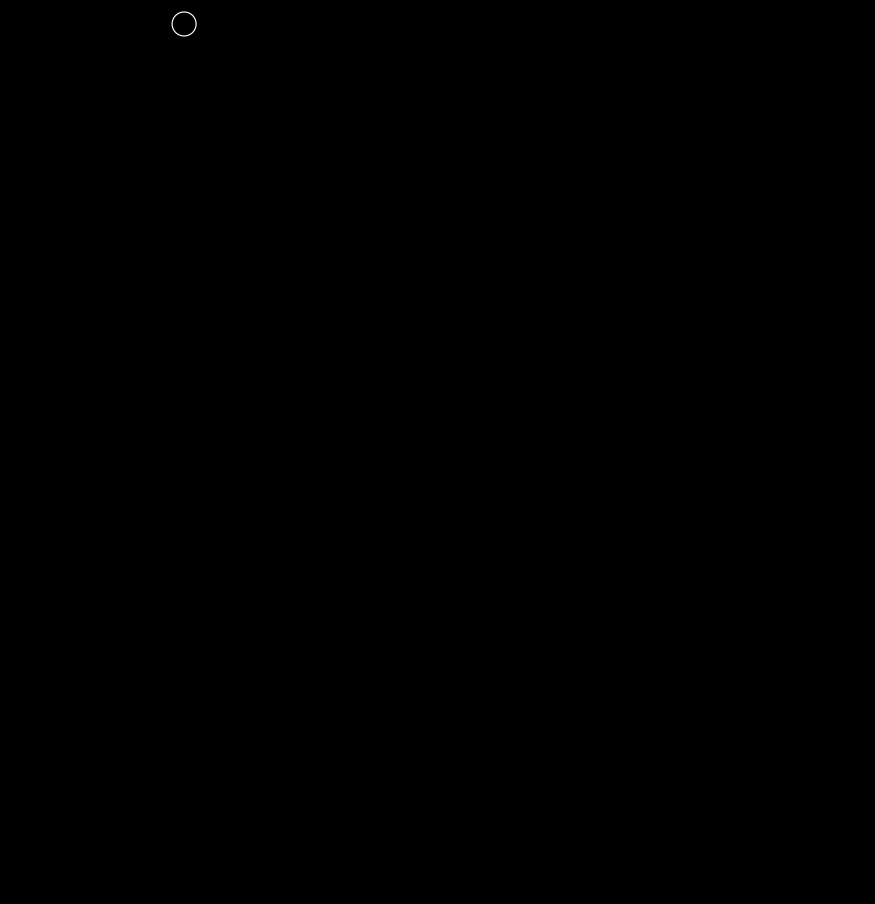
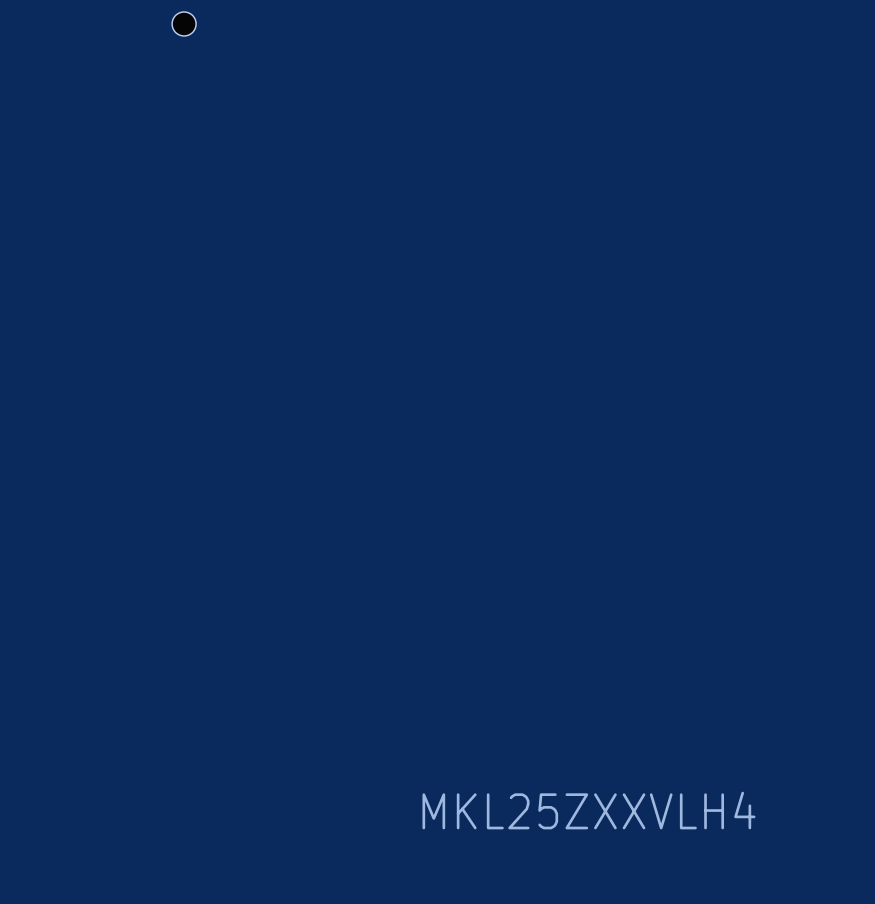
part: none -> MKL25ZXXVLH4 (588, 810)

